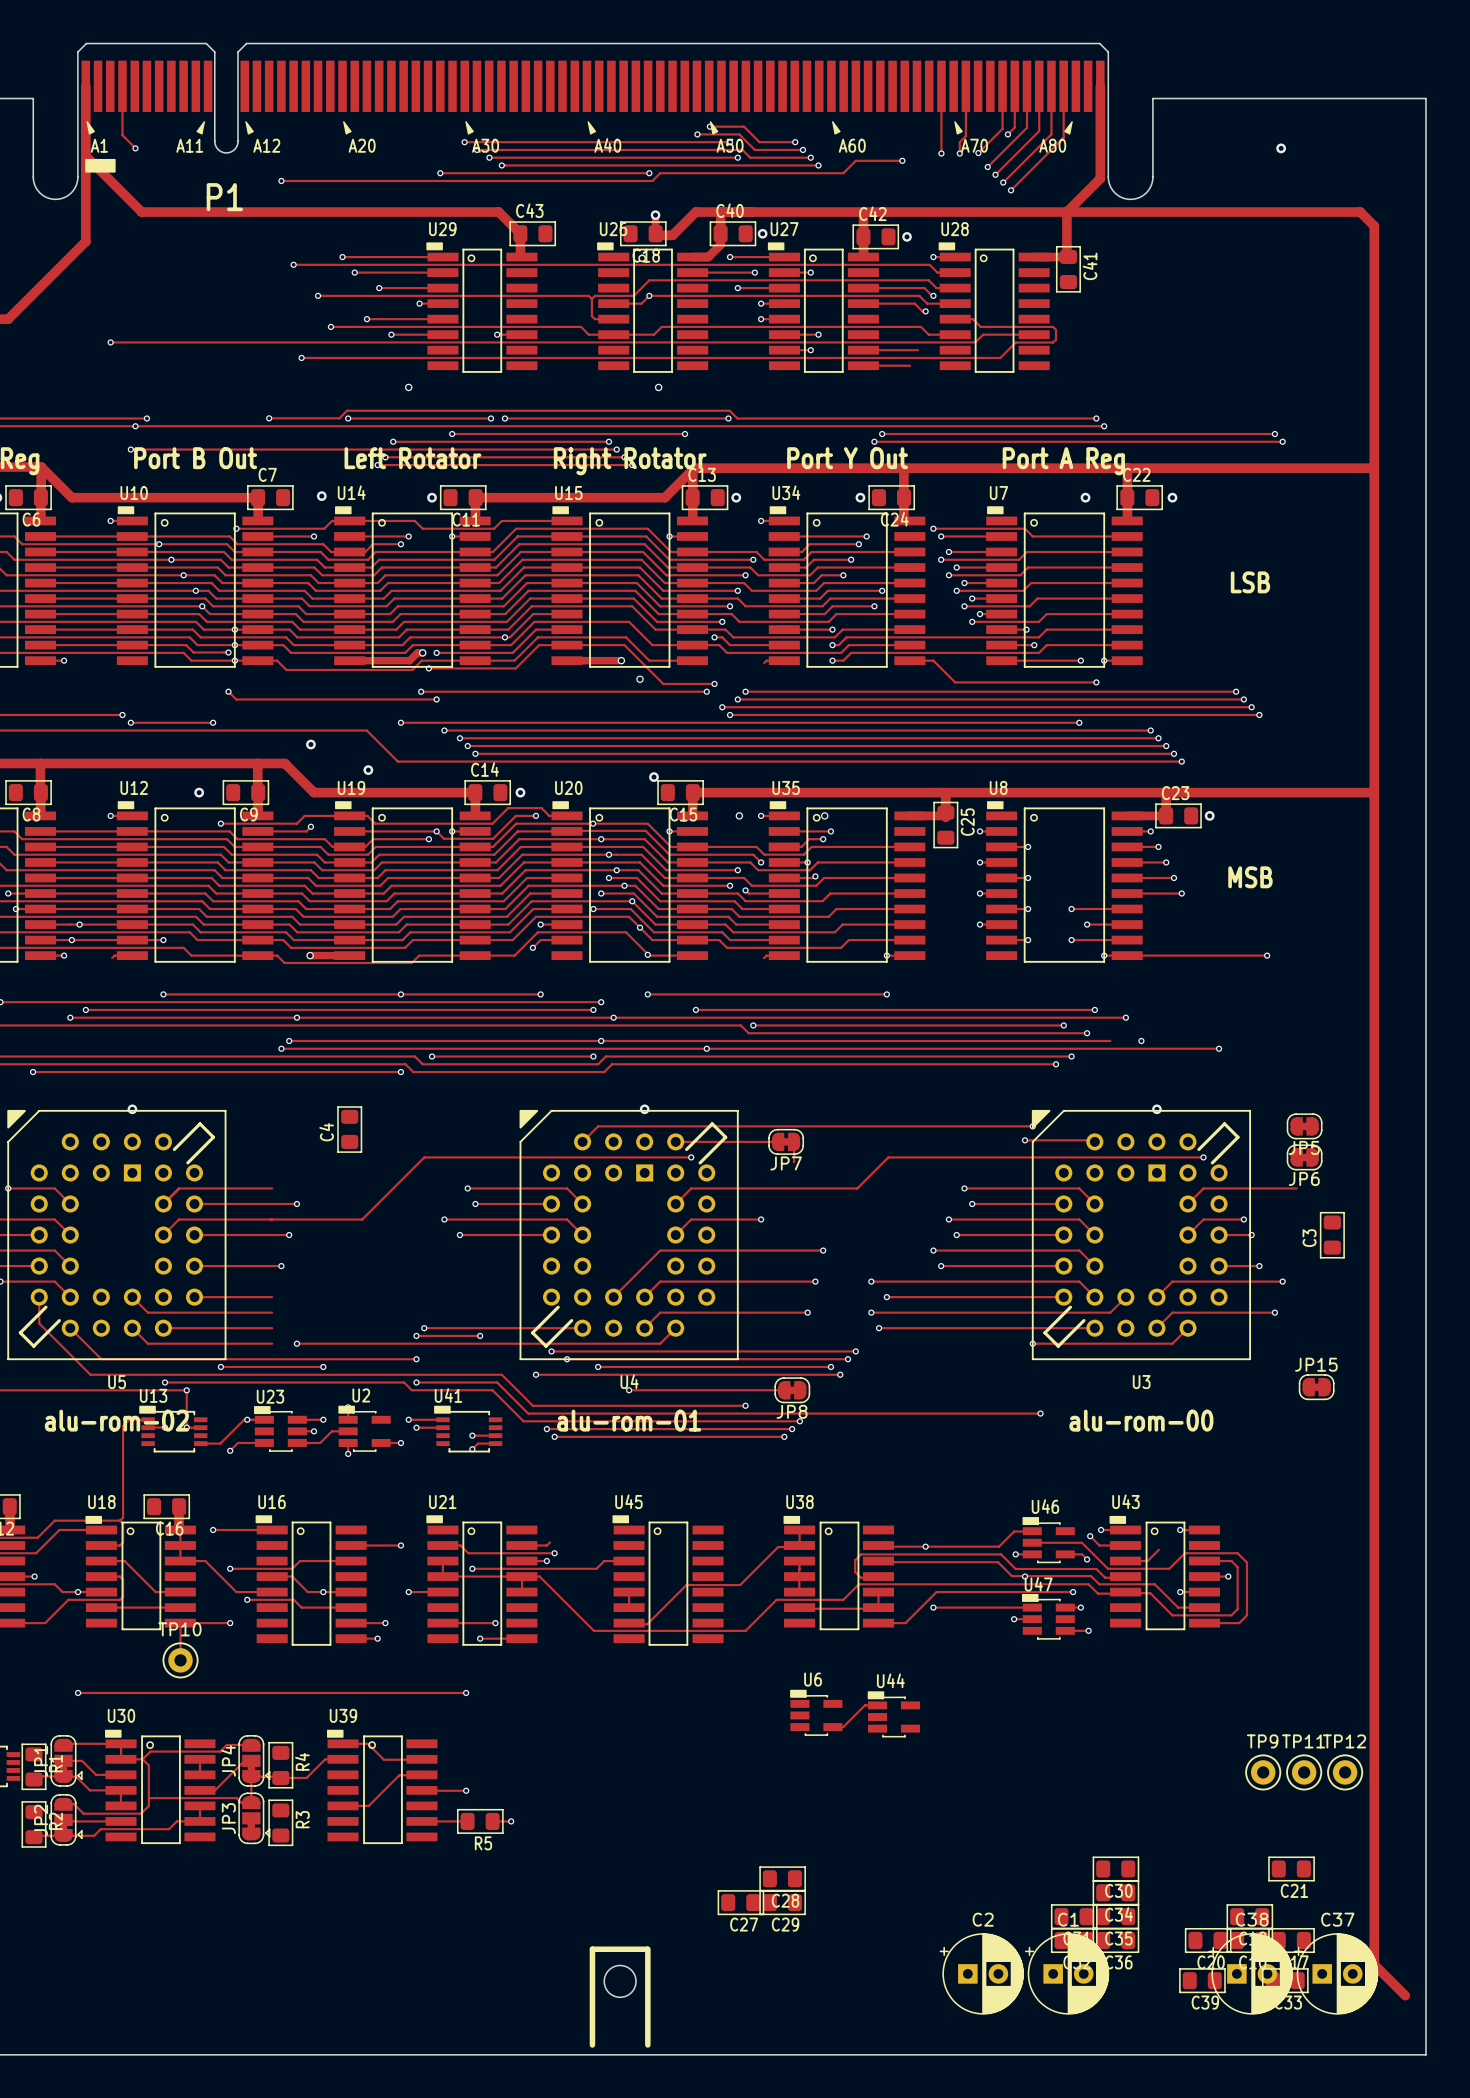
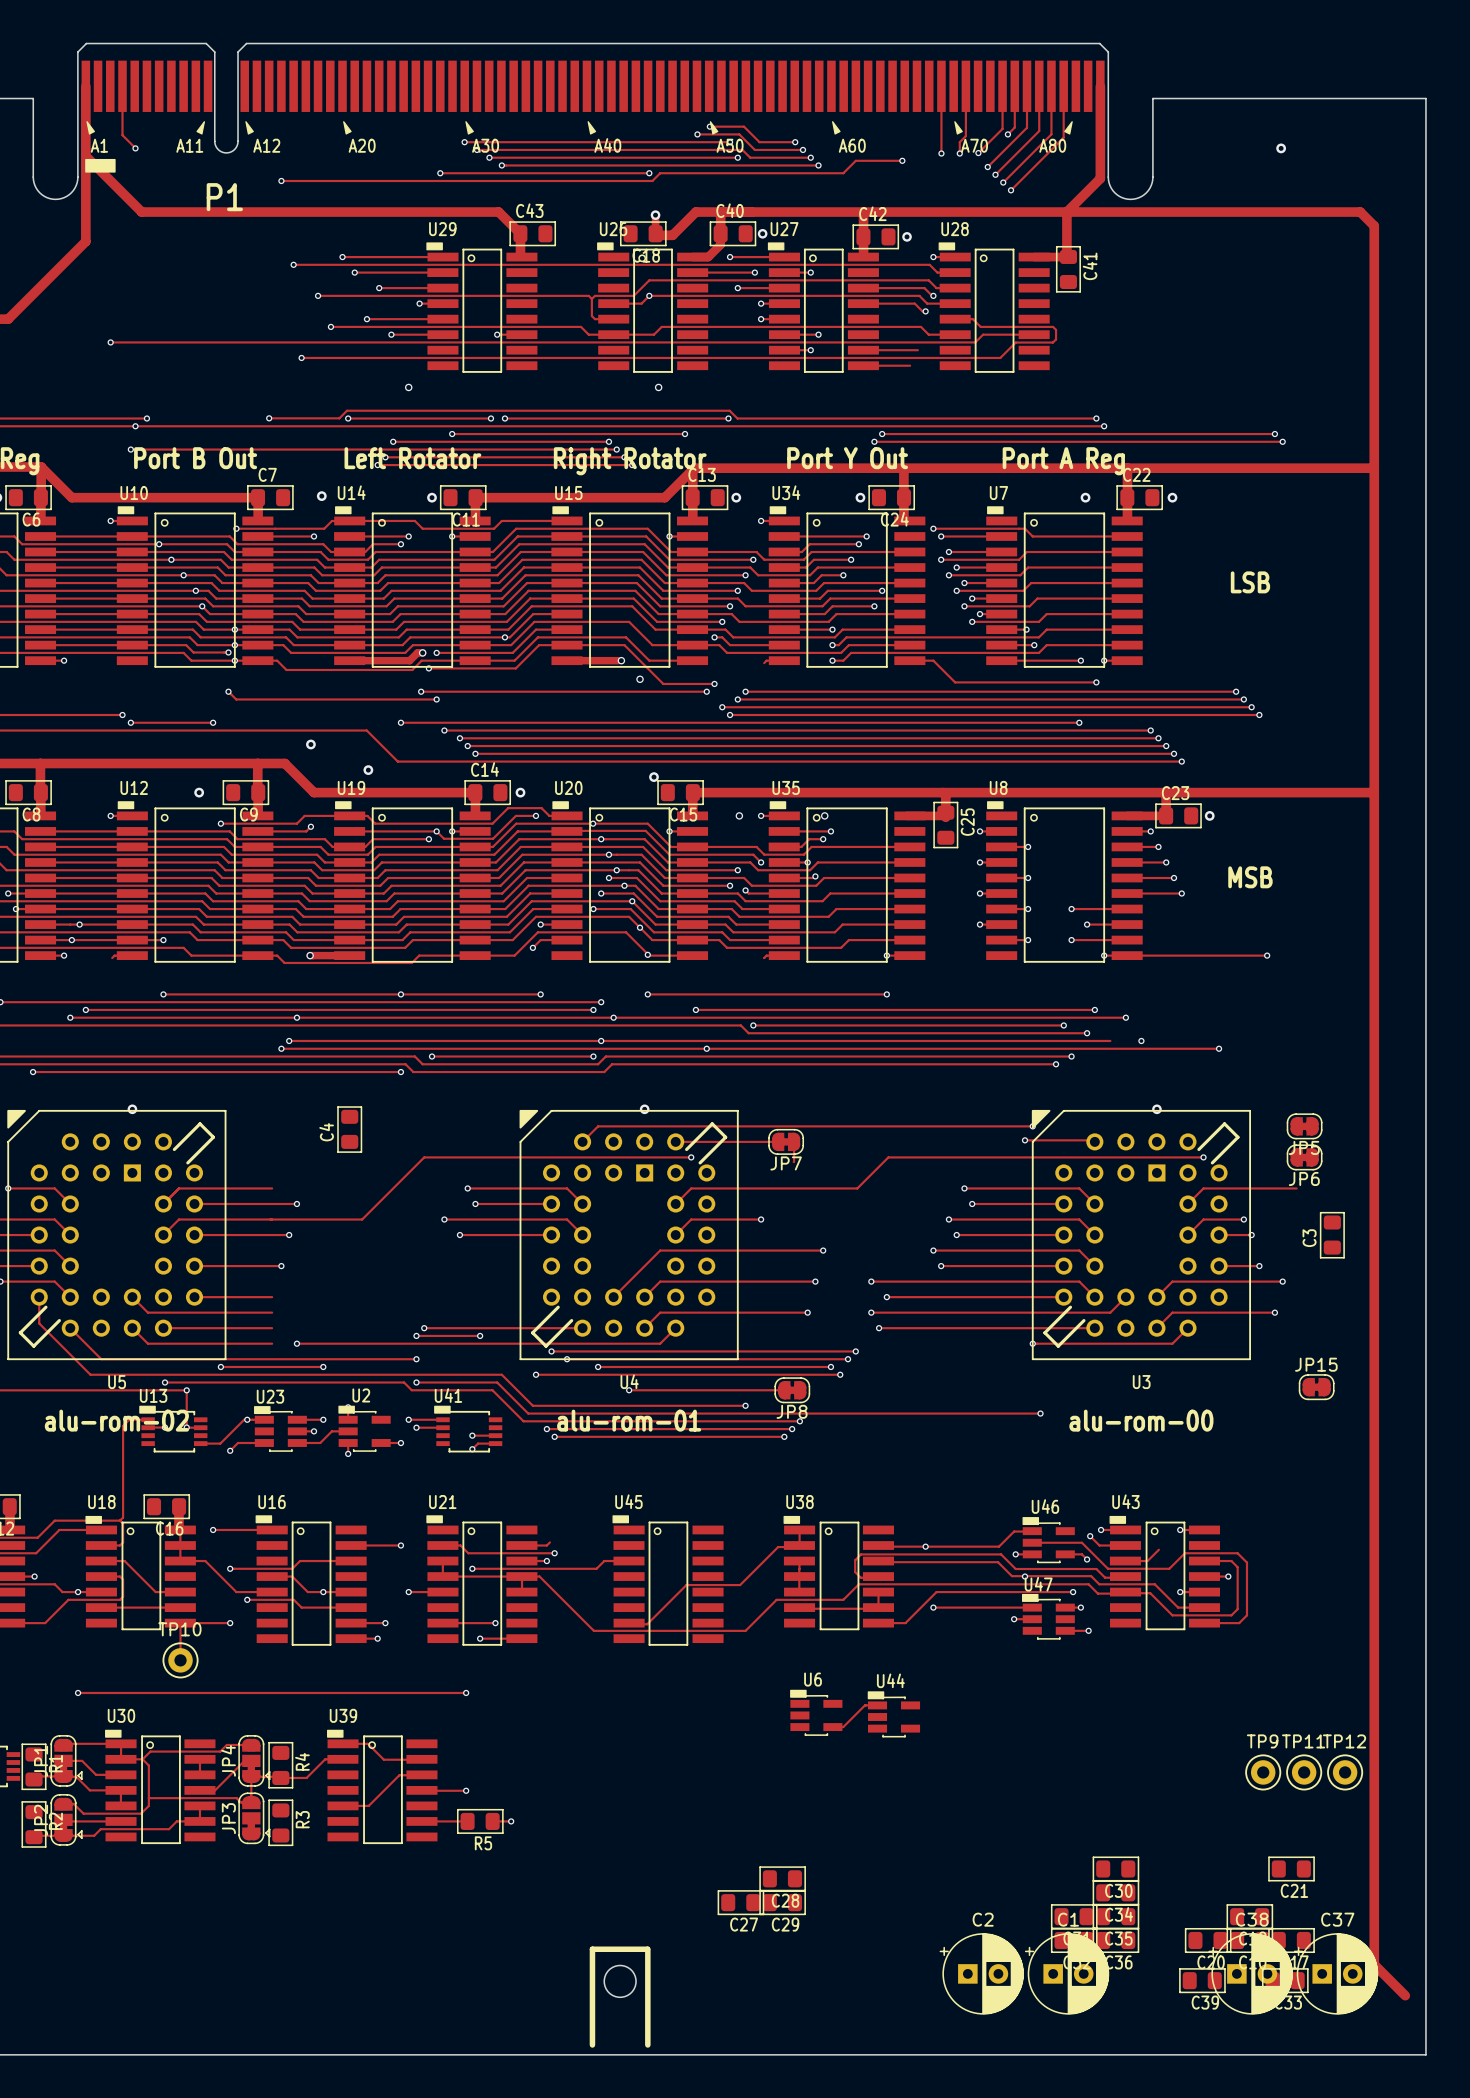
track: (629, 1592) (629, 1607) -> none

